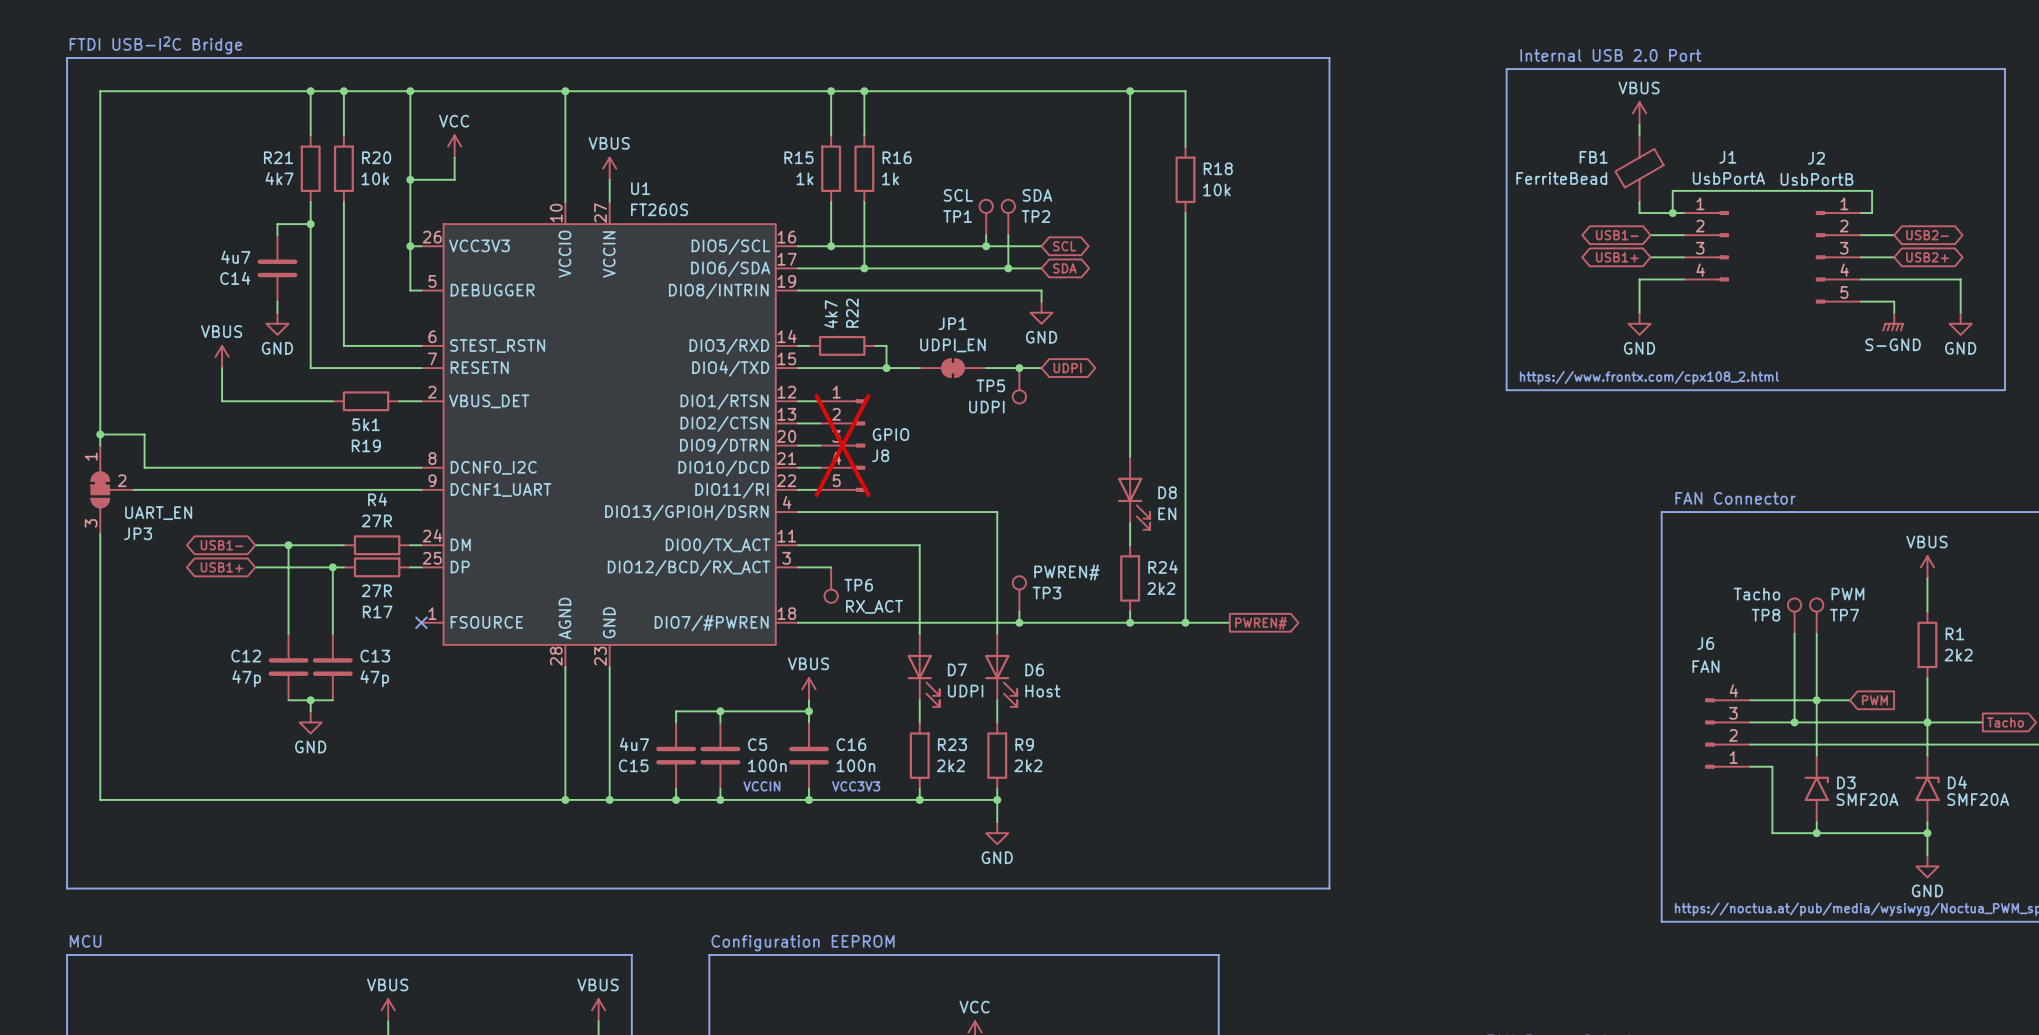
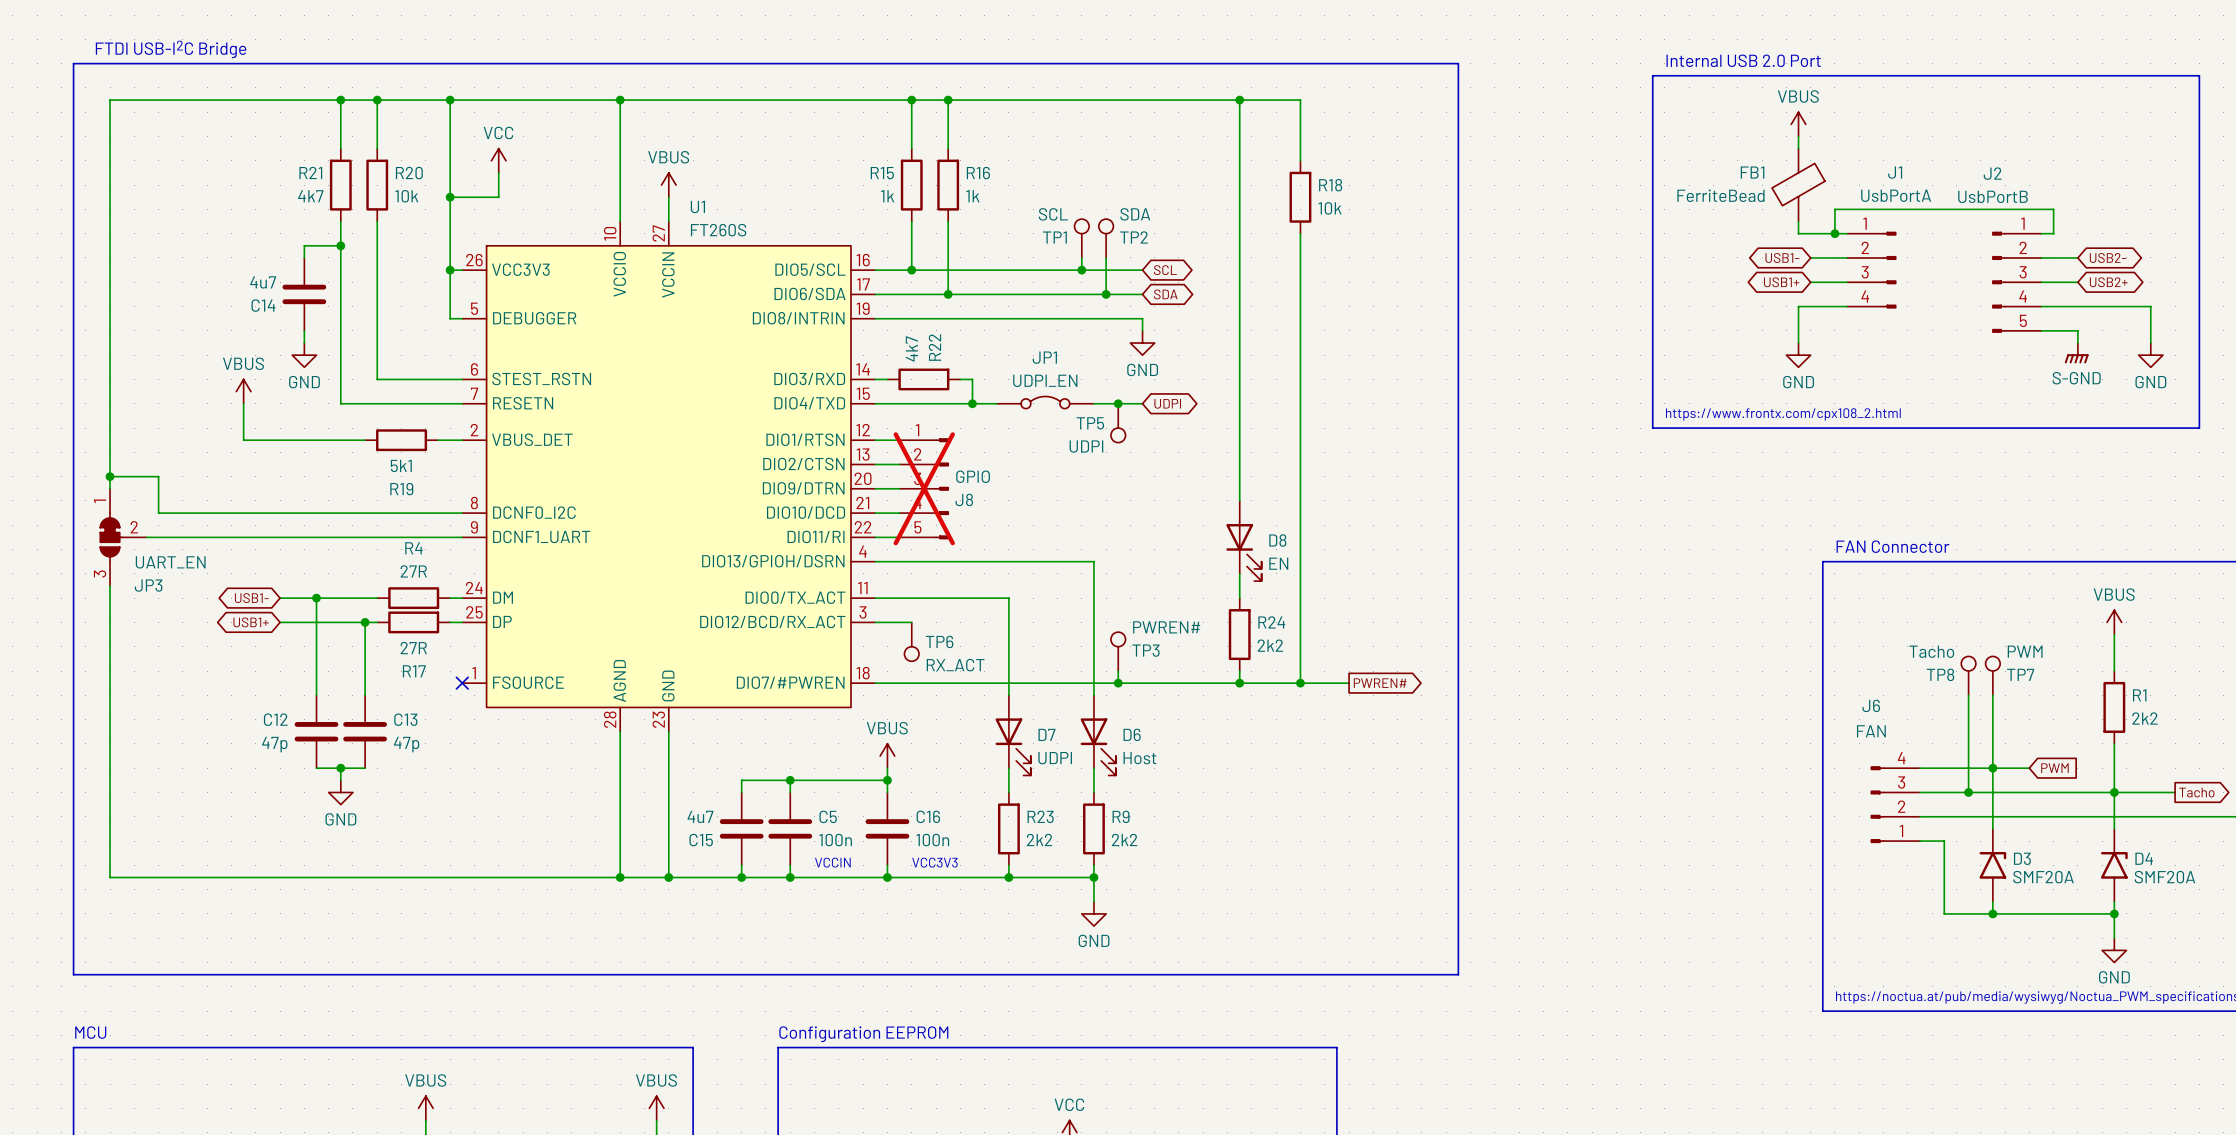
JP1 symbol: [919, 359, 987, 377] -> [996, 396, 1094, 409]

